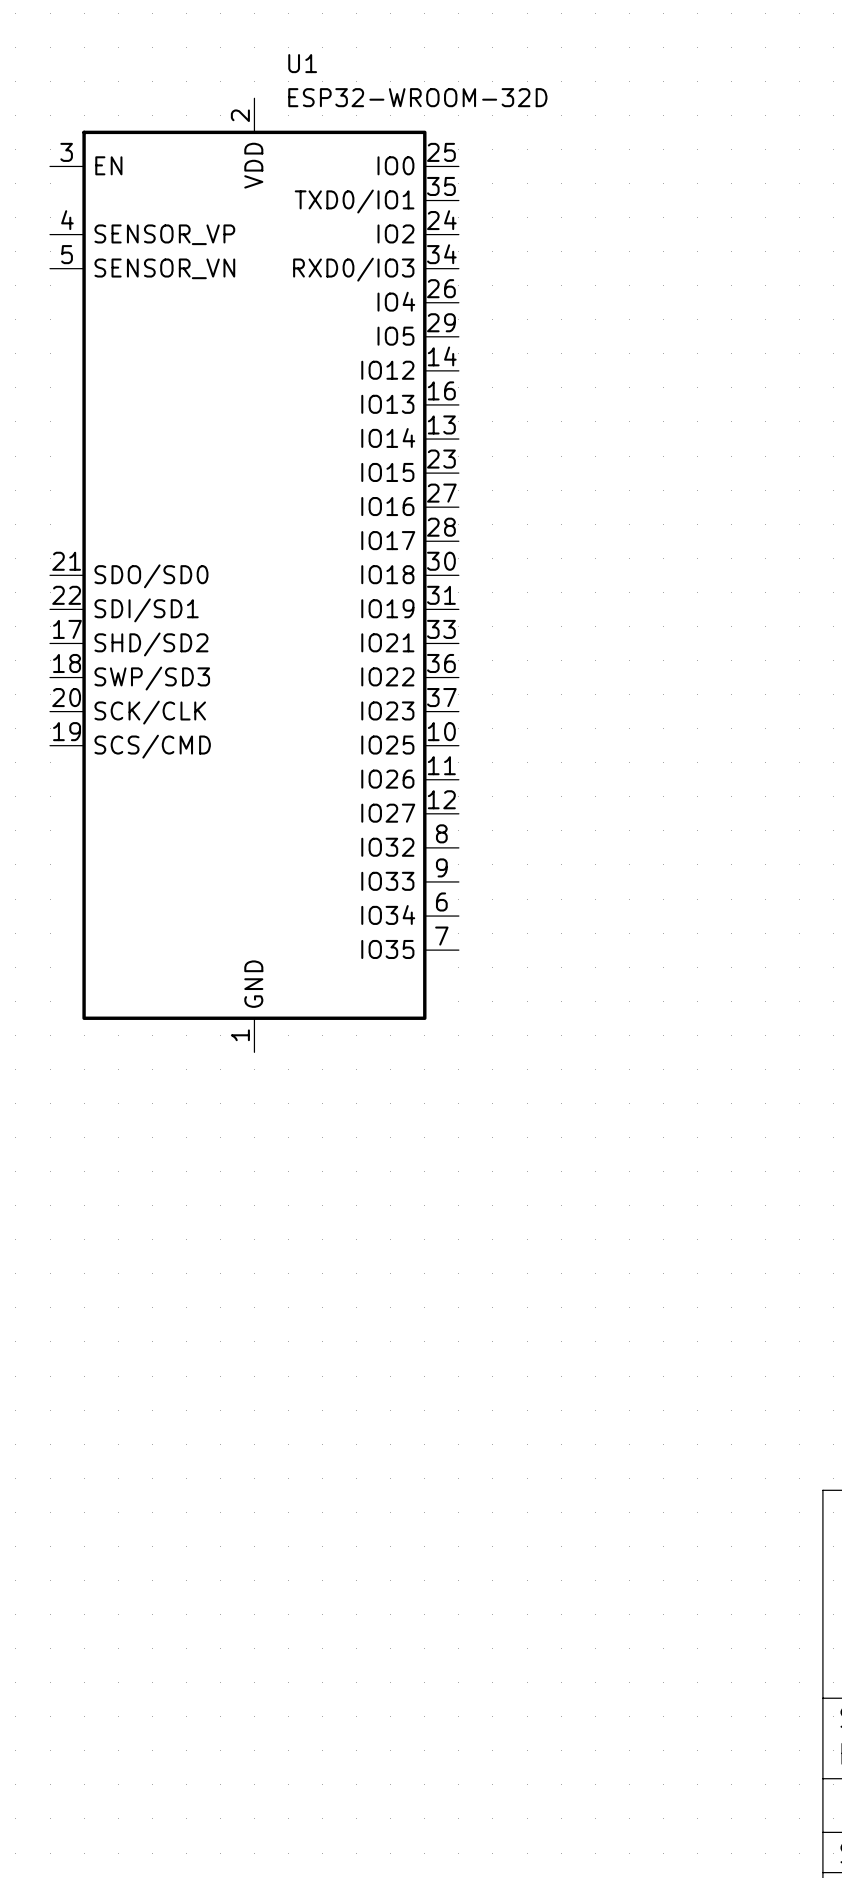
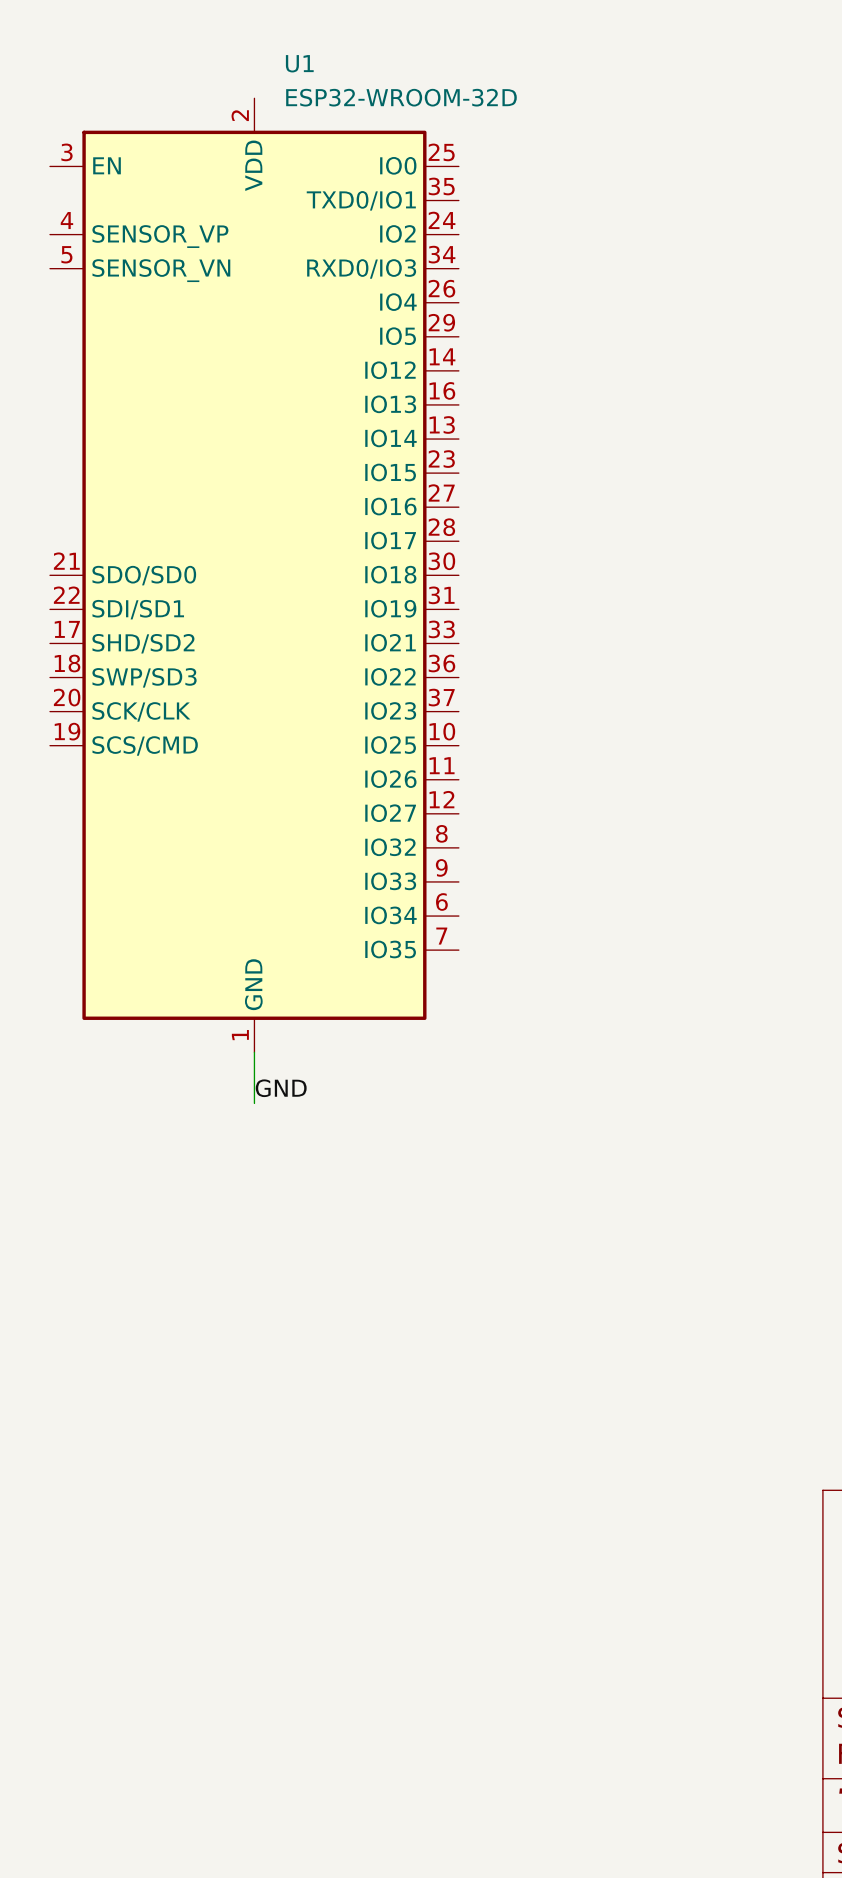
wire: none -> (254, 1052) (254, 1103)
label: none -> GND (281, 1088)

